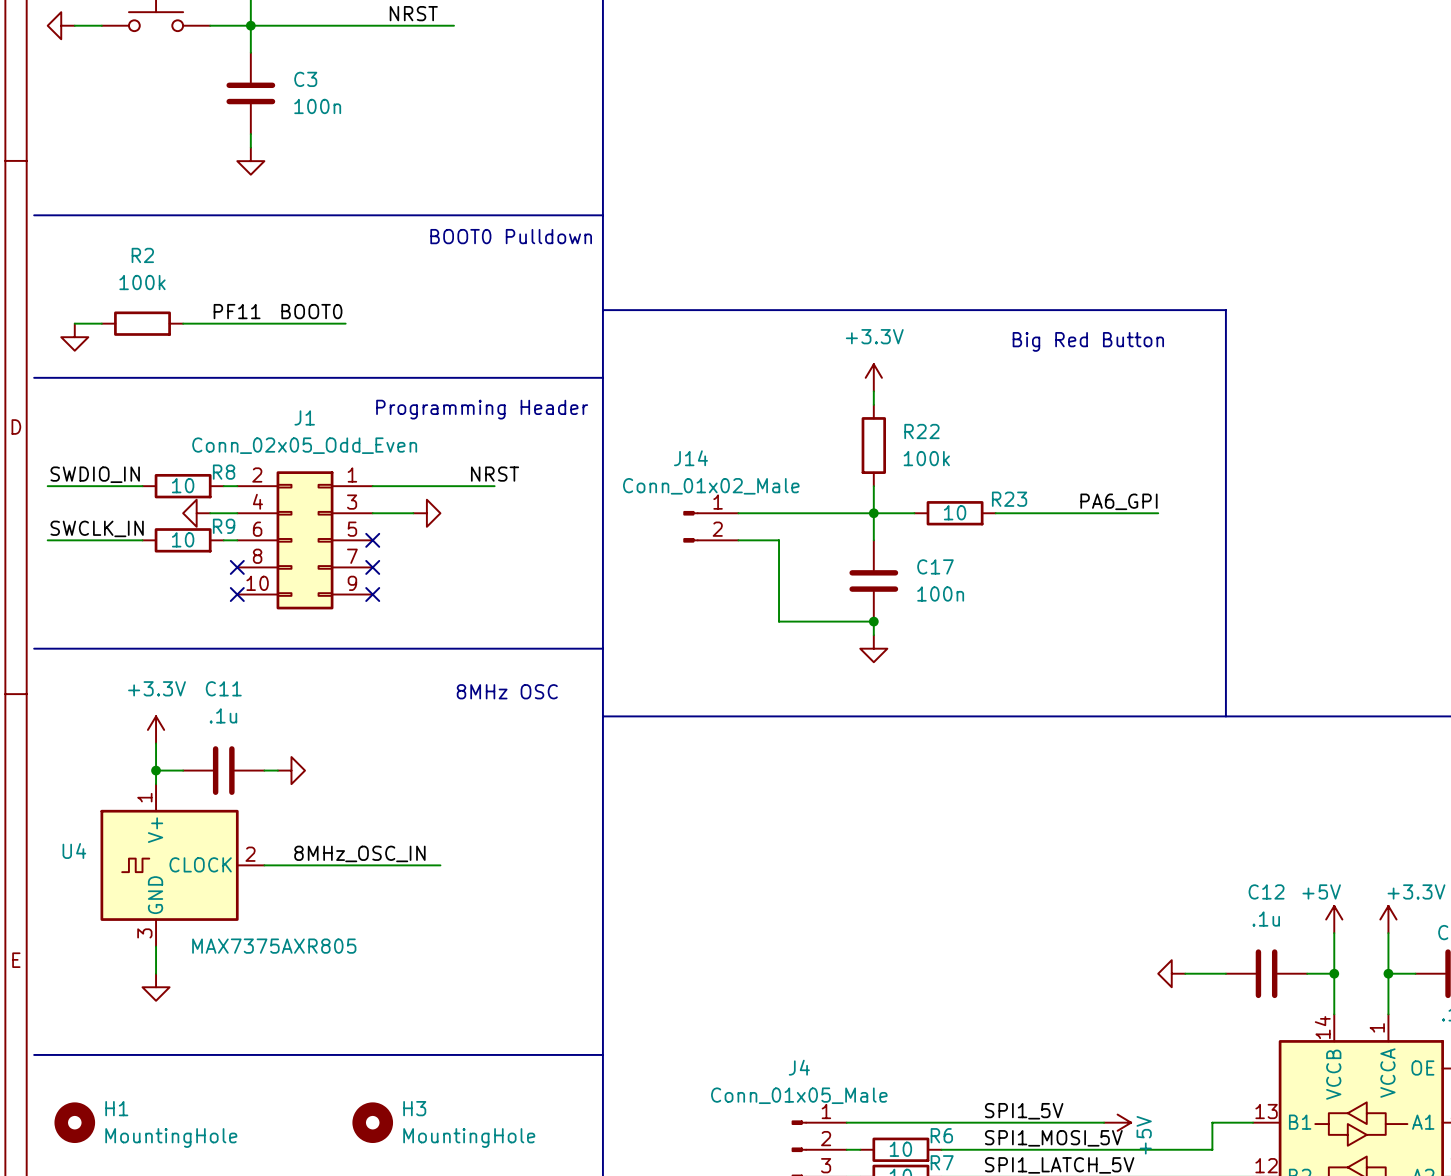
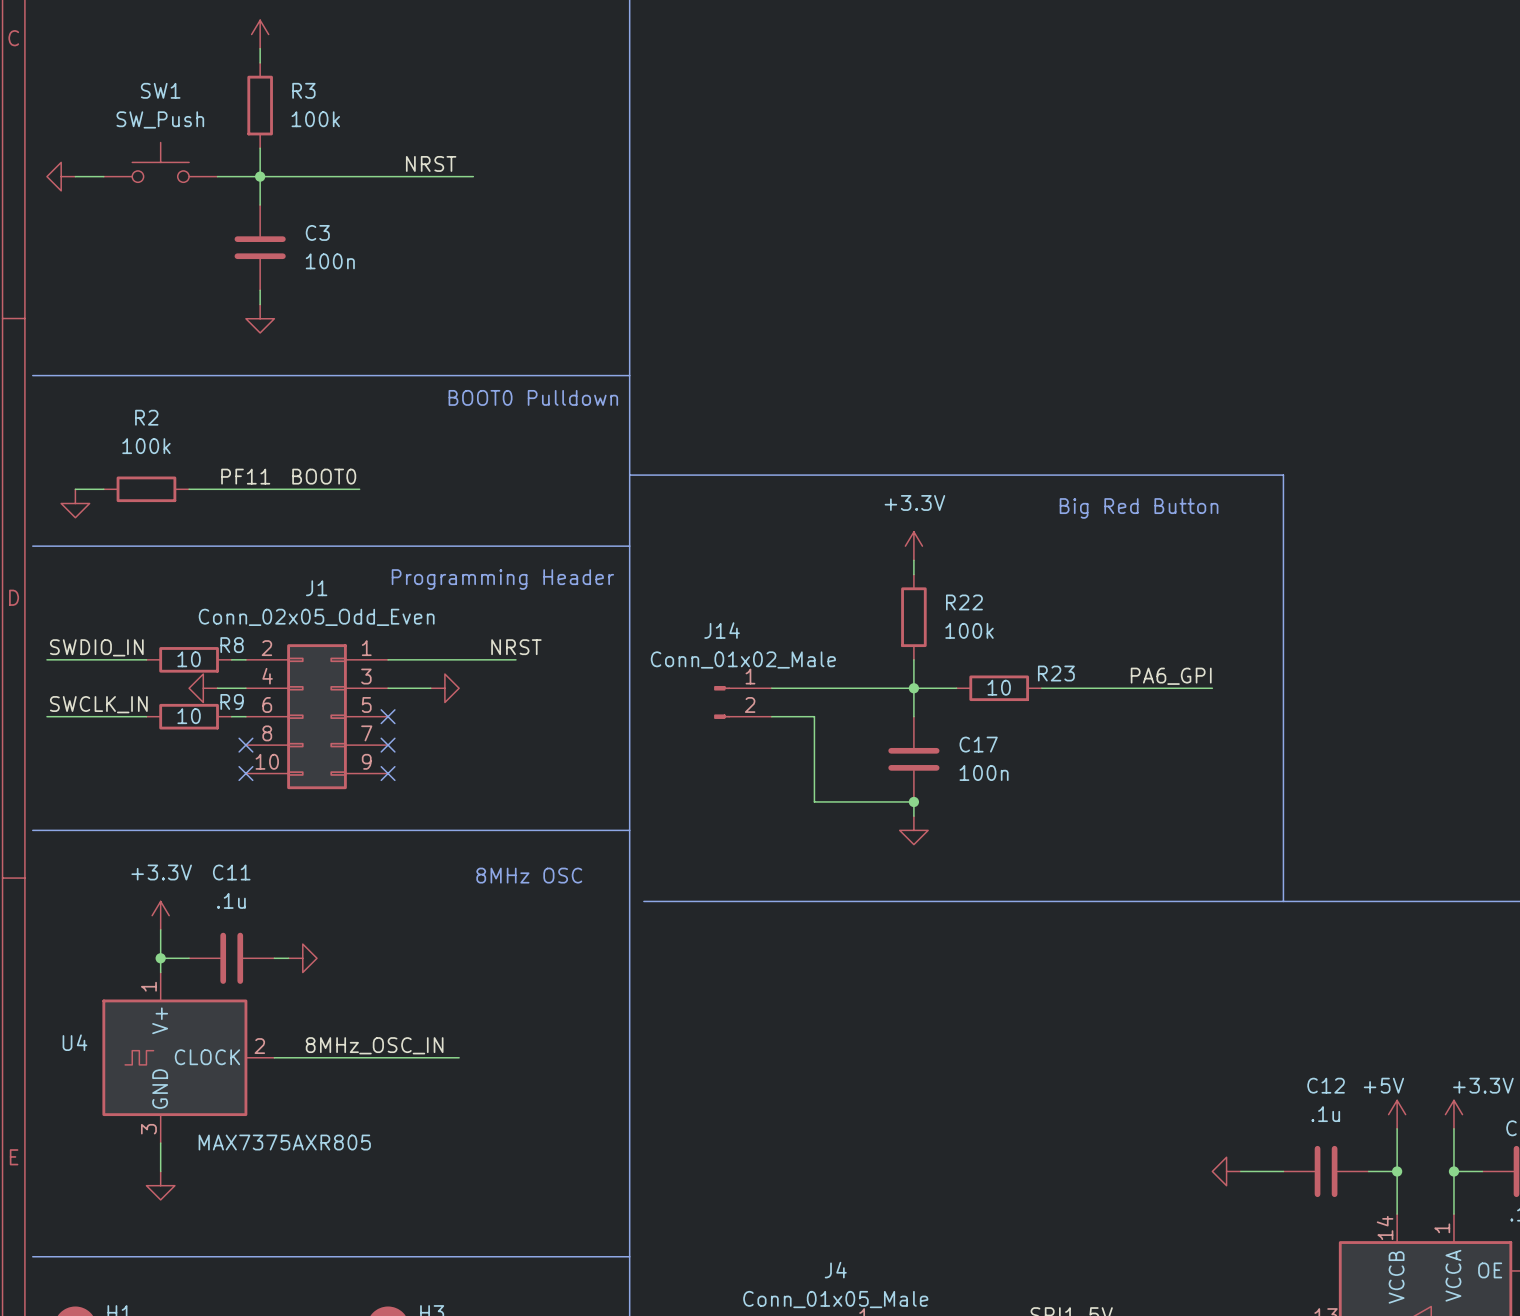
line: (602, 716) (616, 716) -> none

